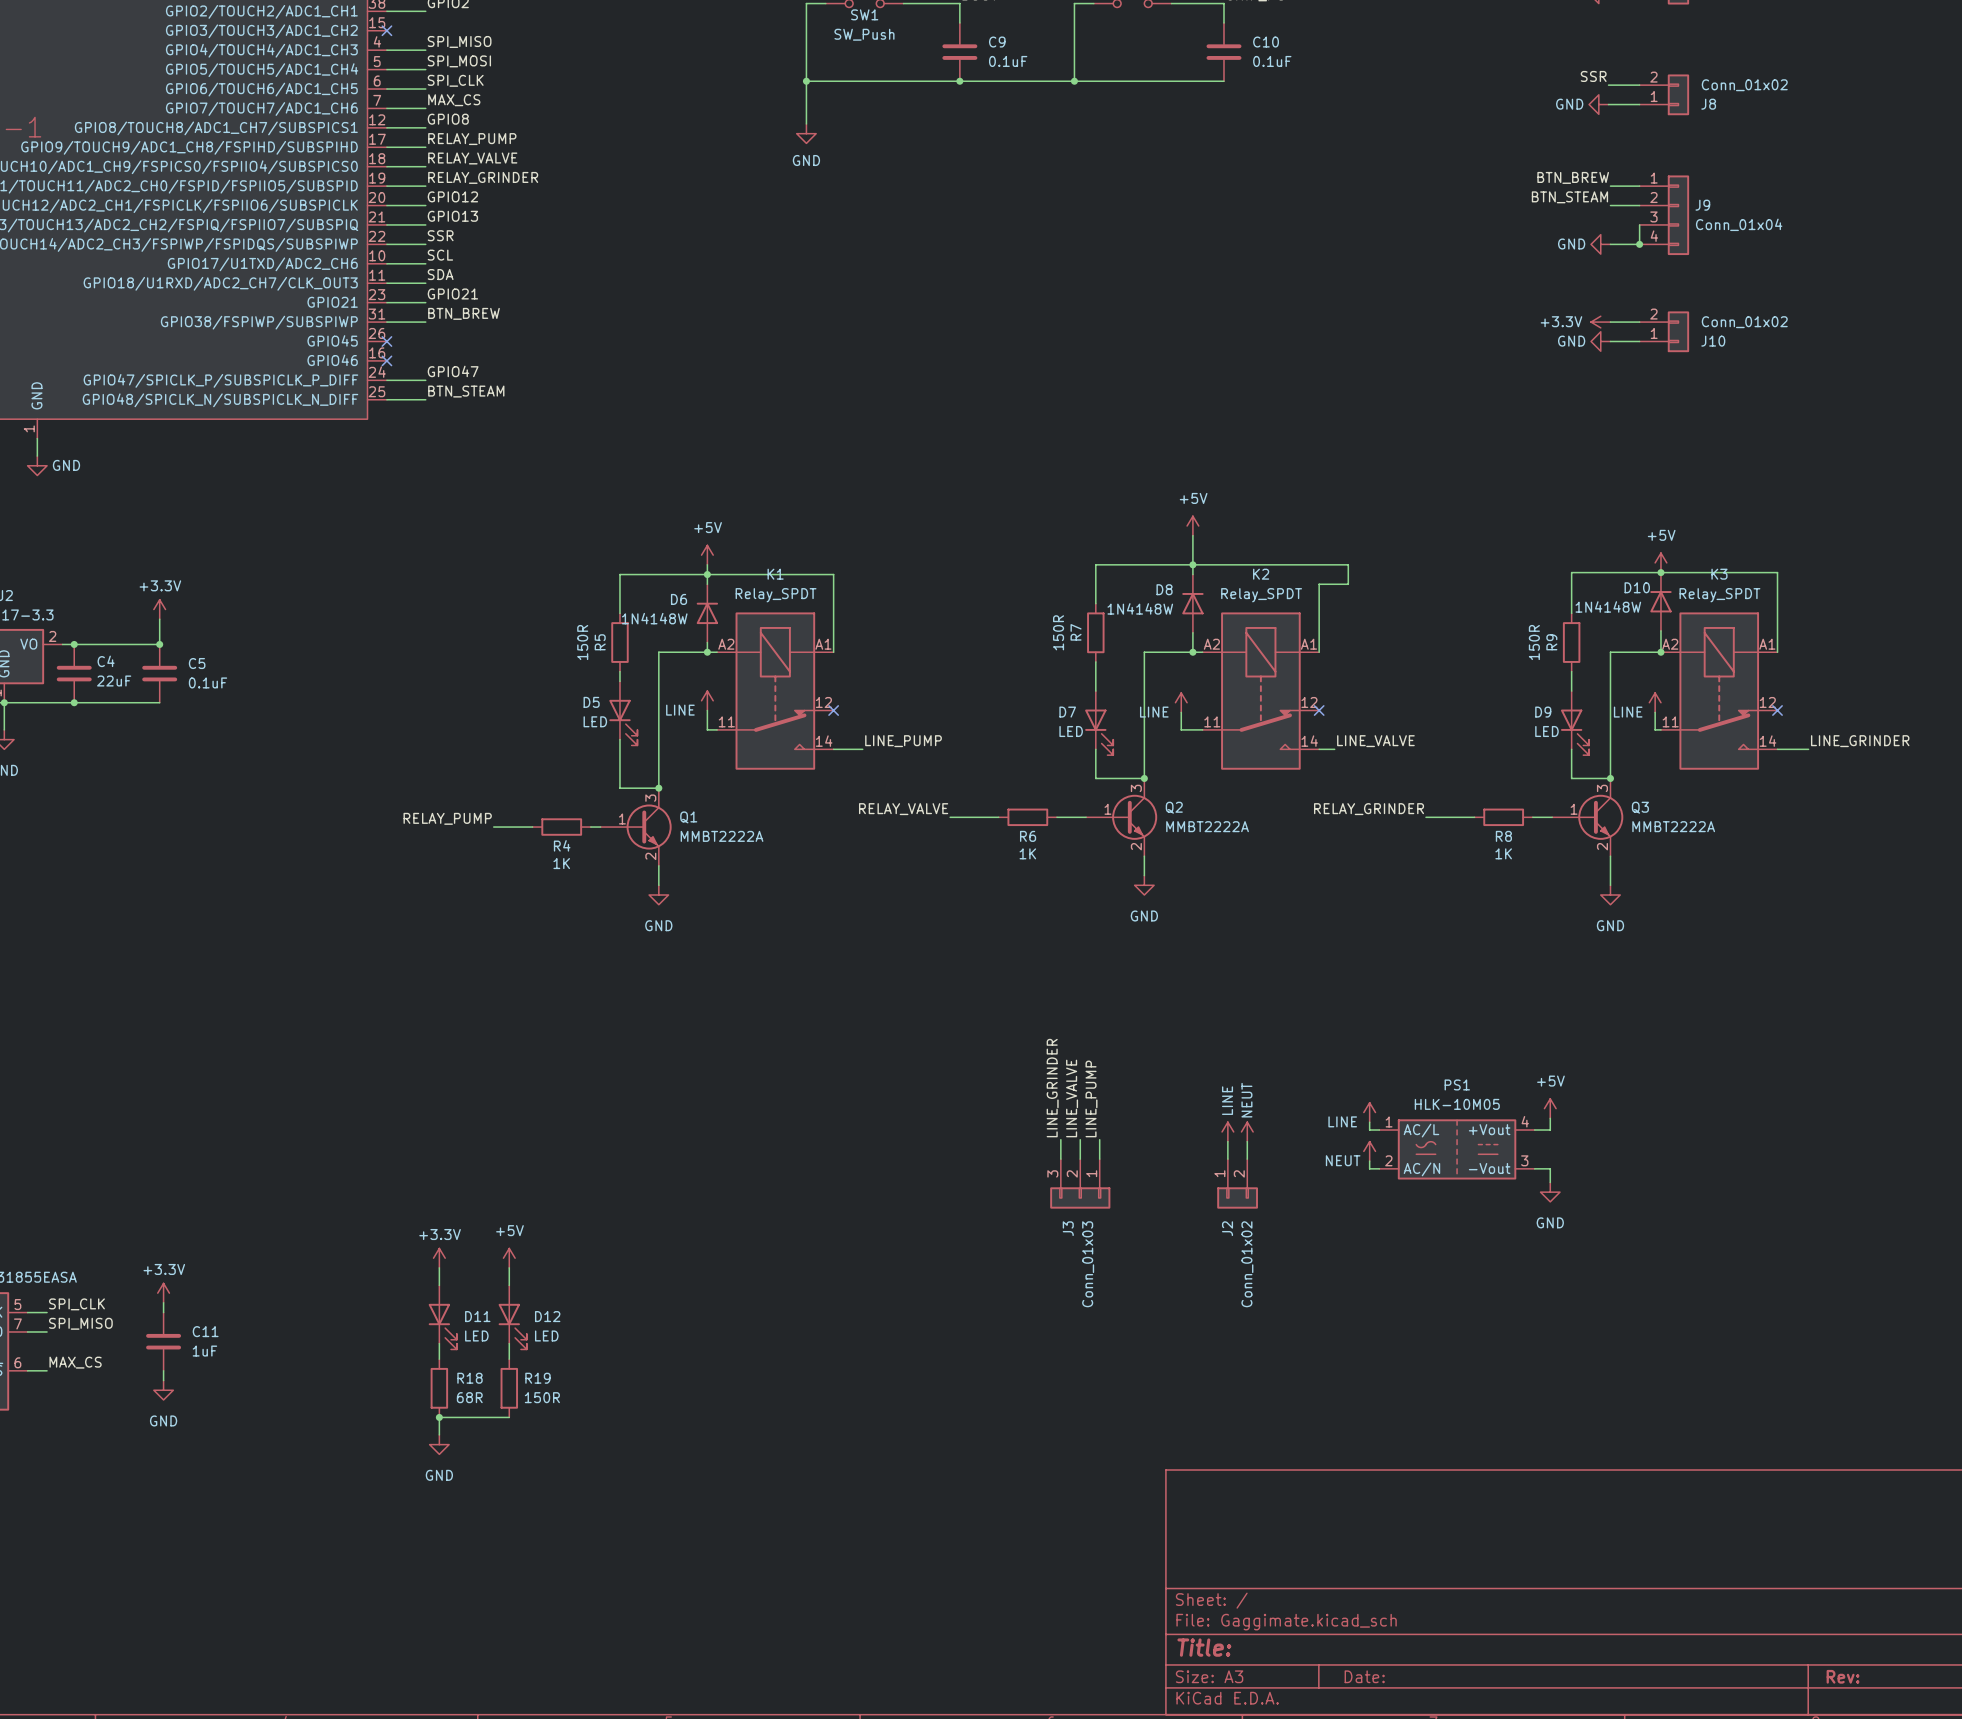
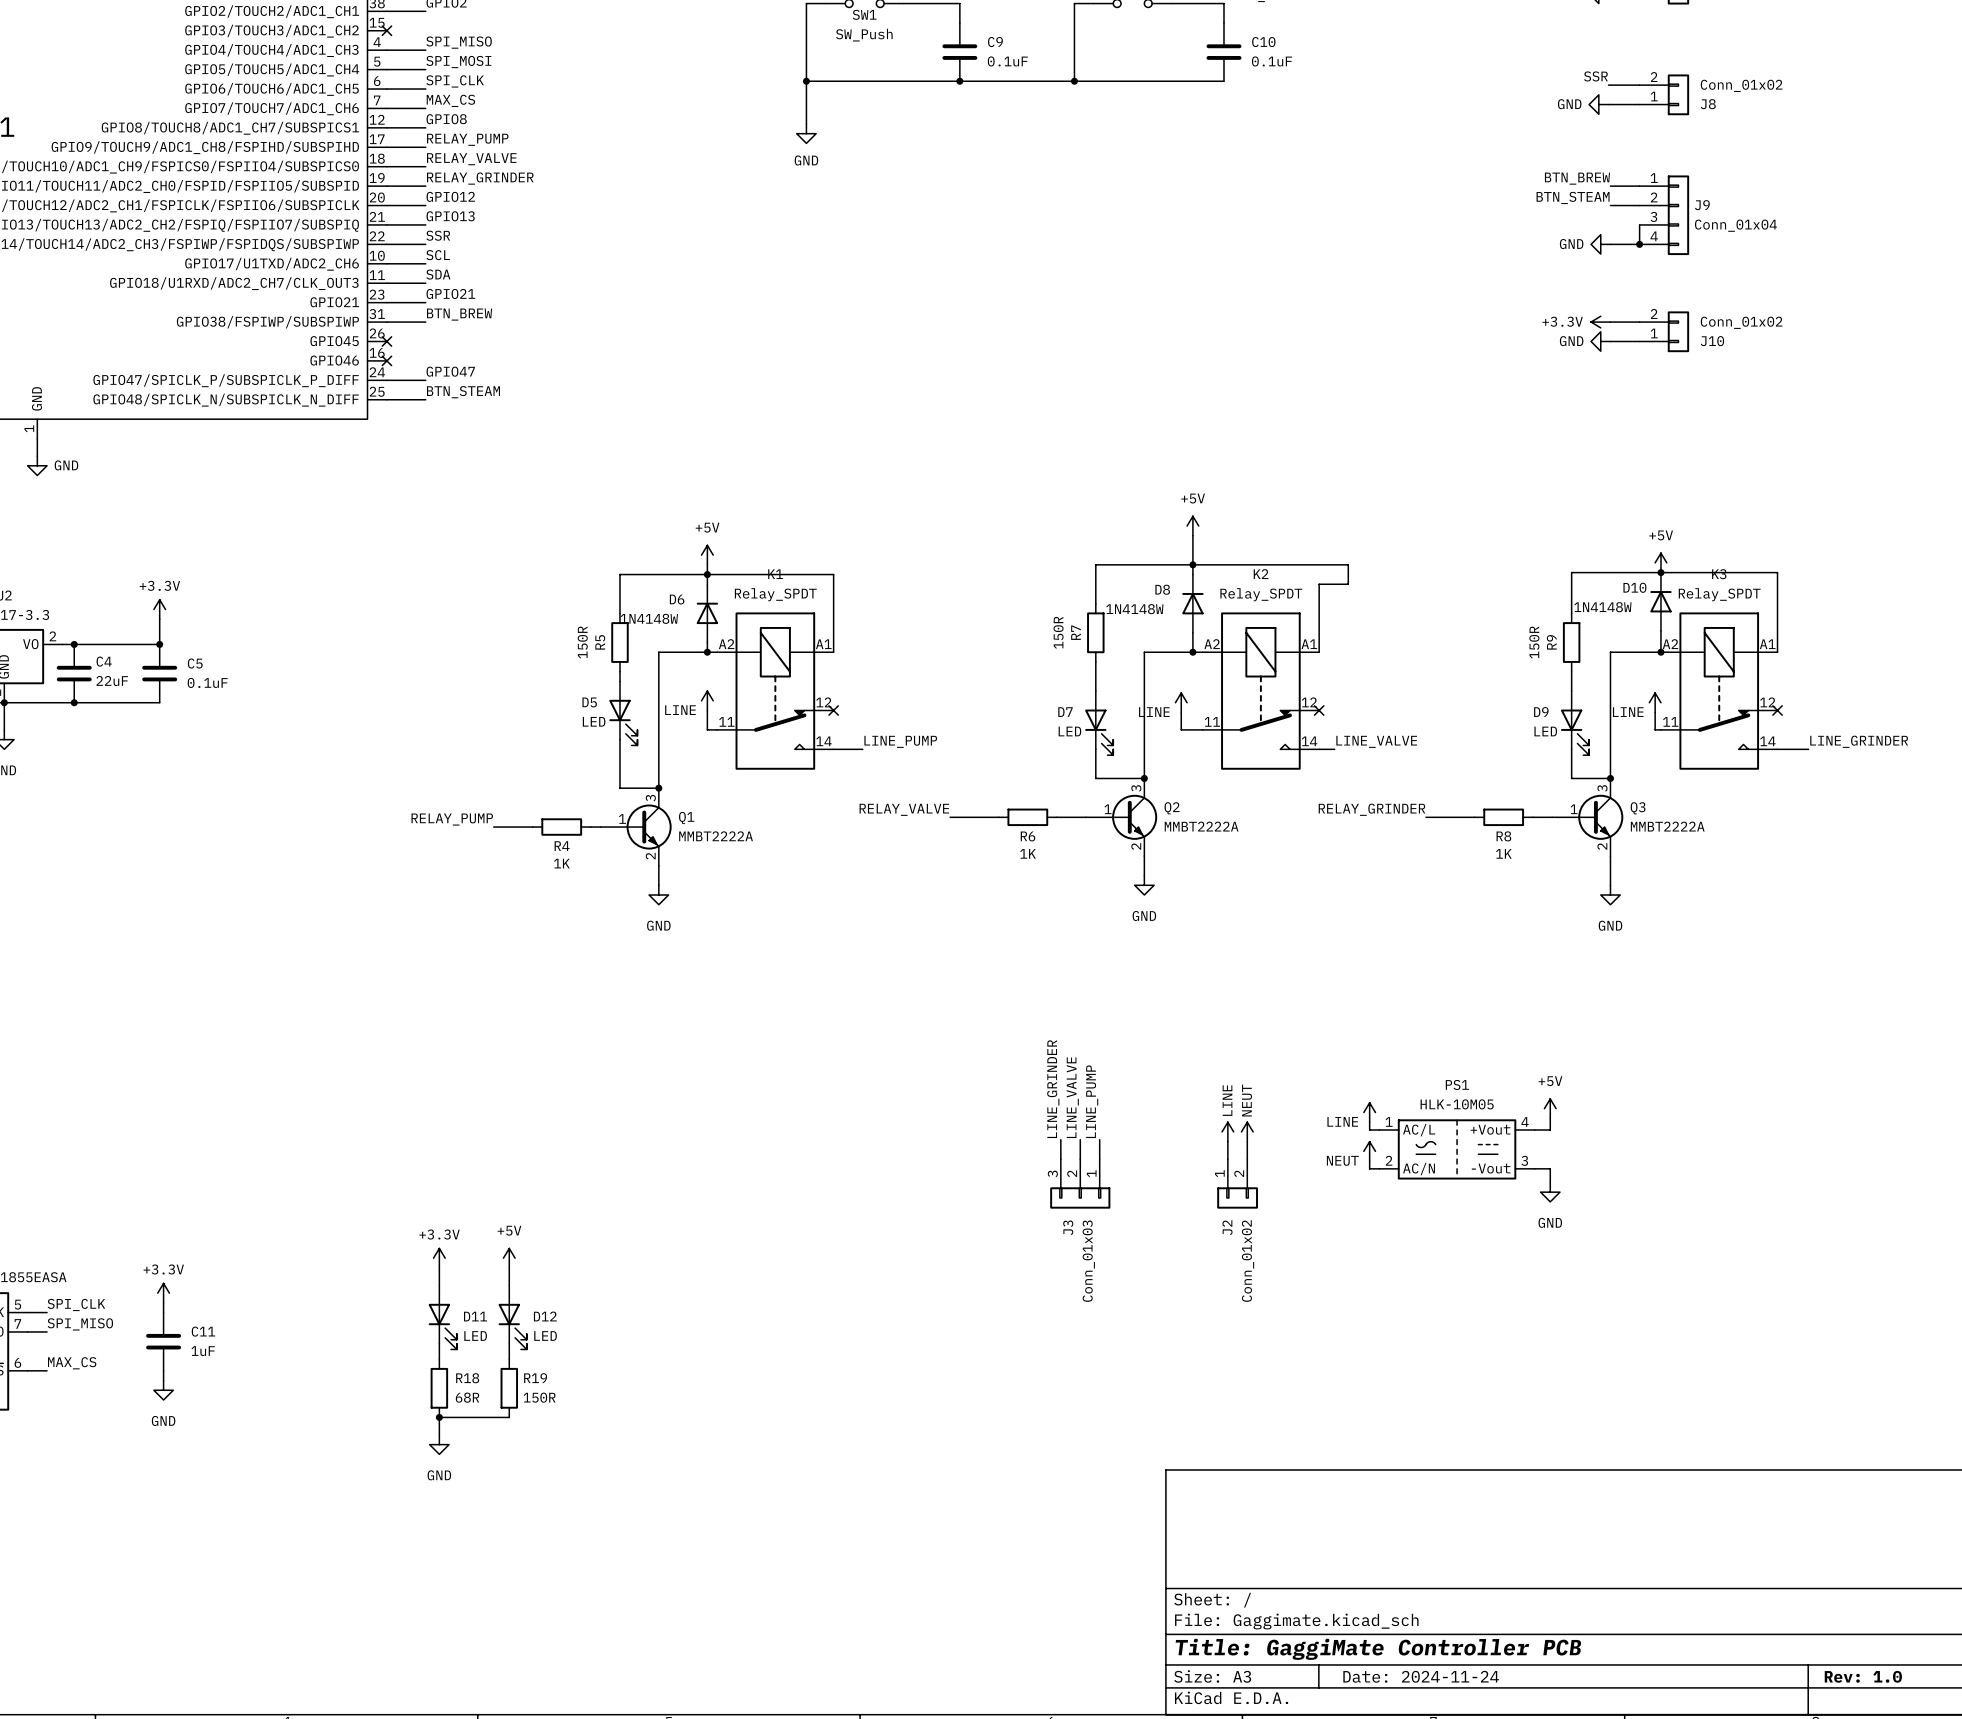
title block: Title: (1204, 1647) -> Title: GaggiMate Controller PCB (1378, 1649)
title block: Date: (1364, 1676) -> Date: 2024-11-24 (1421, 1676)
title block: Rev: (1843, 1676) -> Rev: 1.0 (1863, 1676)

